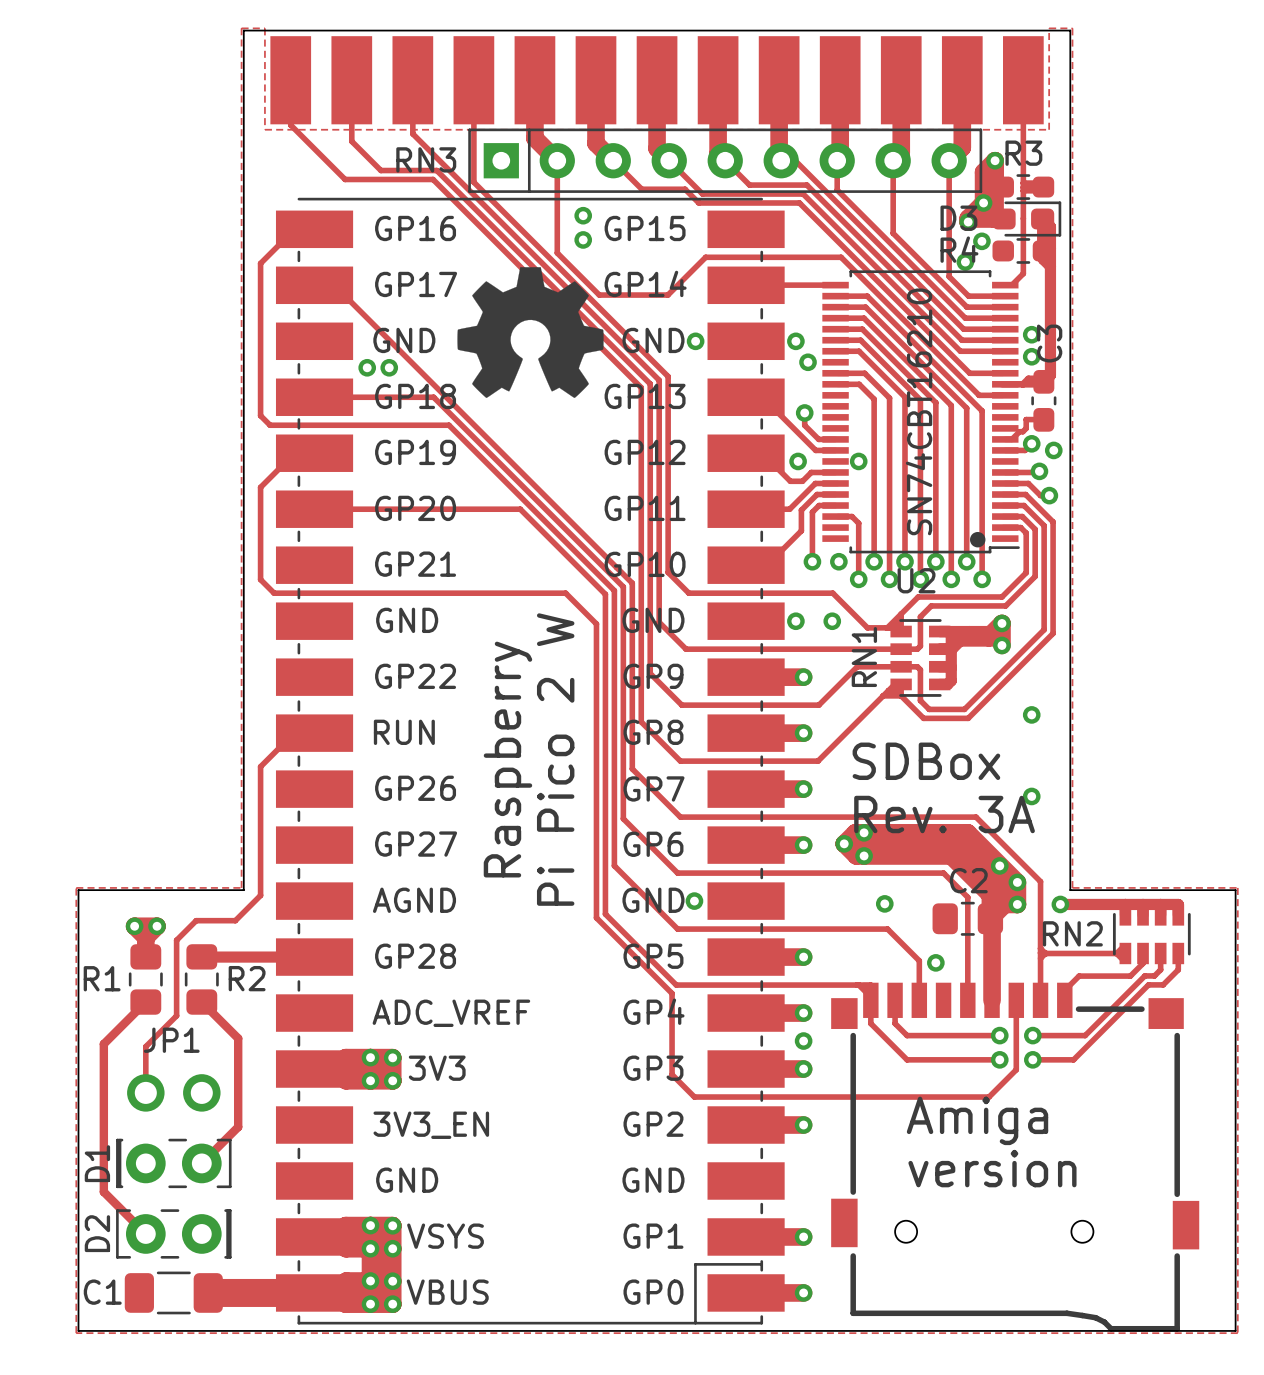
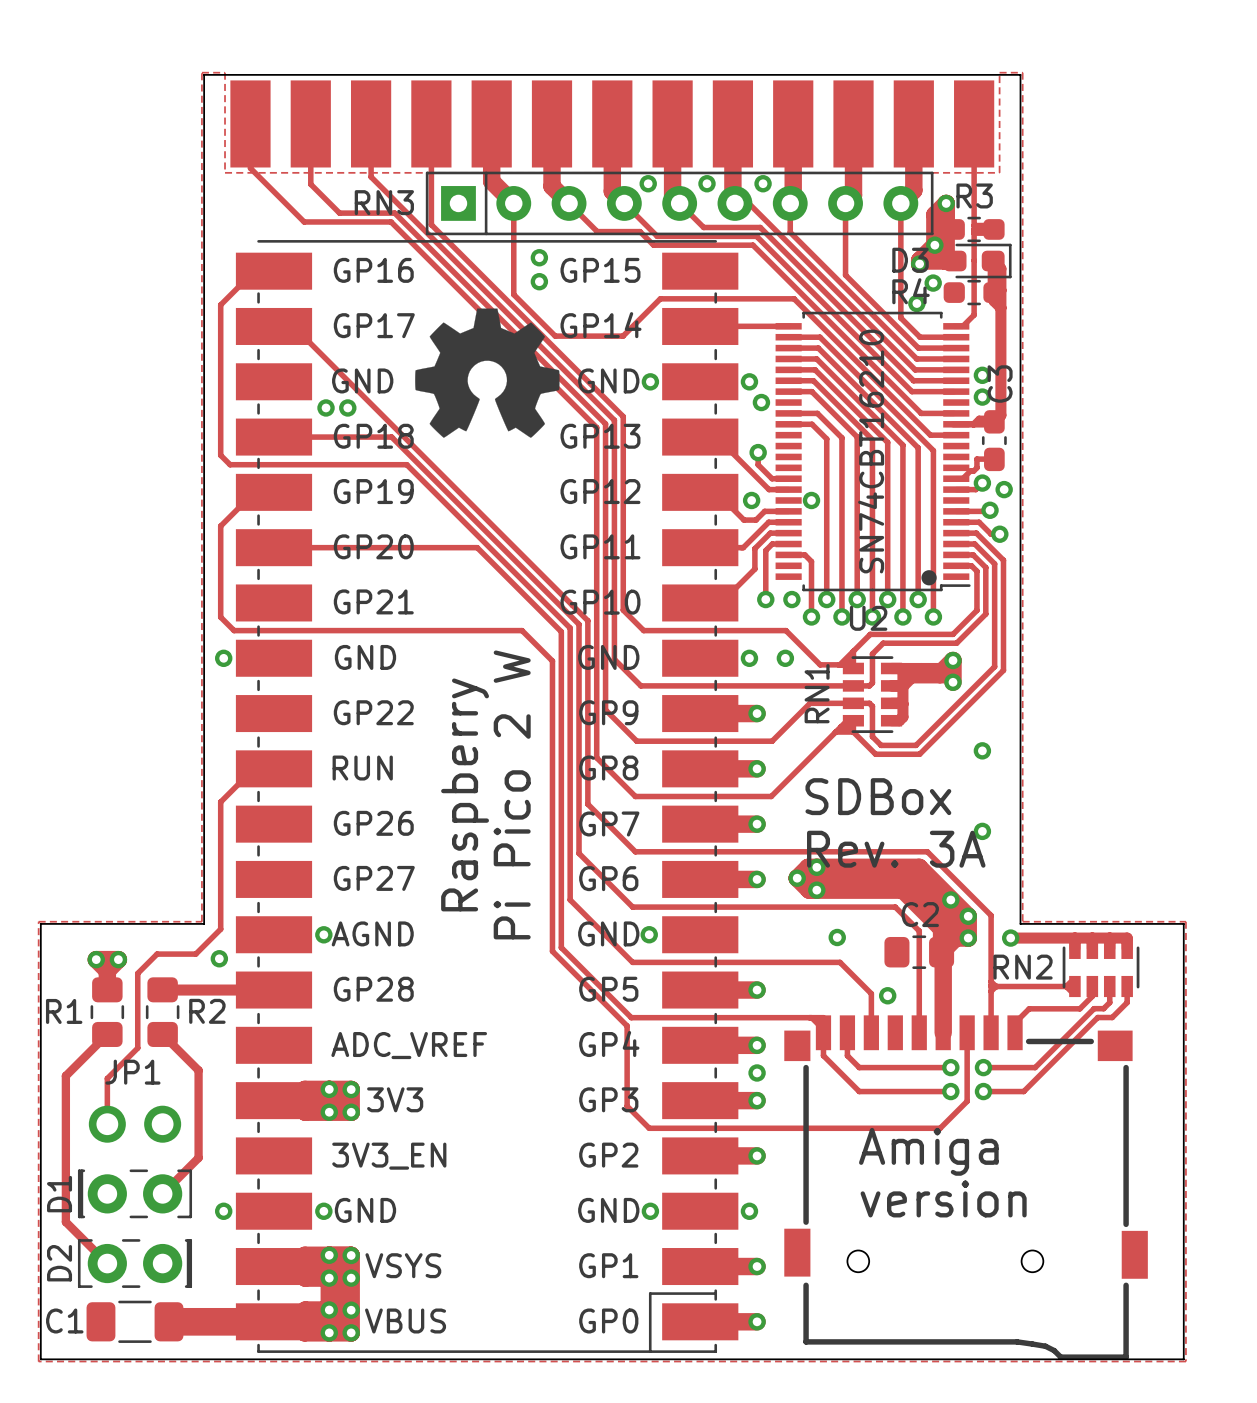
via: none -> (648, 183)
via: none -> (707, 183)
via: none -> (763, 183)
via: none -> (223, 658)
via: none -> (323, 934)
via: none -> (219, 958)
via: none -> (223, 1211)
via: none -> (323, 1211)
via: none -> (650, 1211)
via: none -> (749, 1211)

